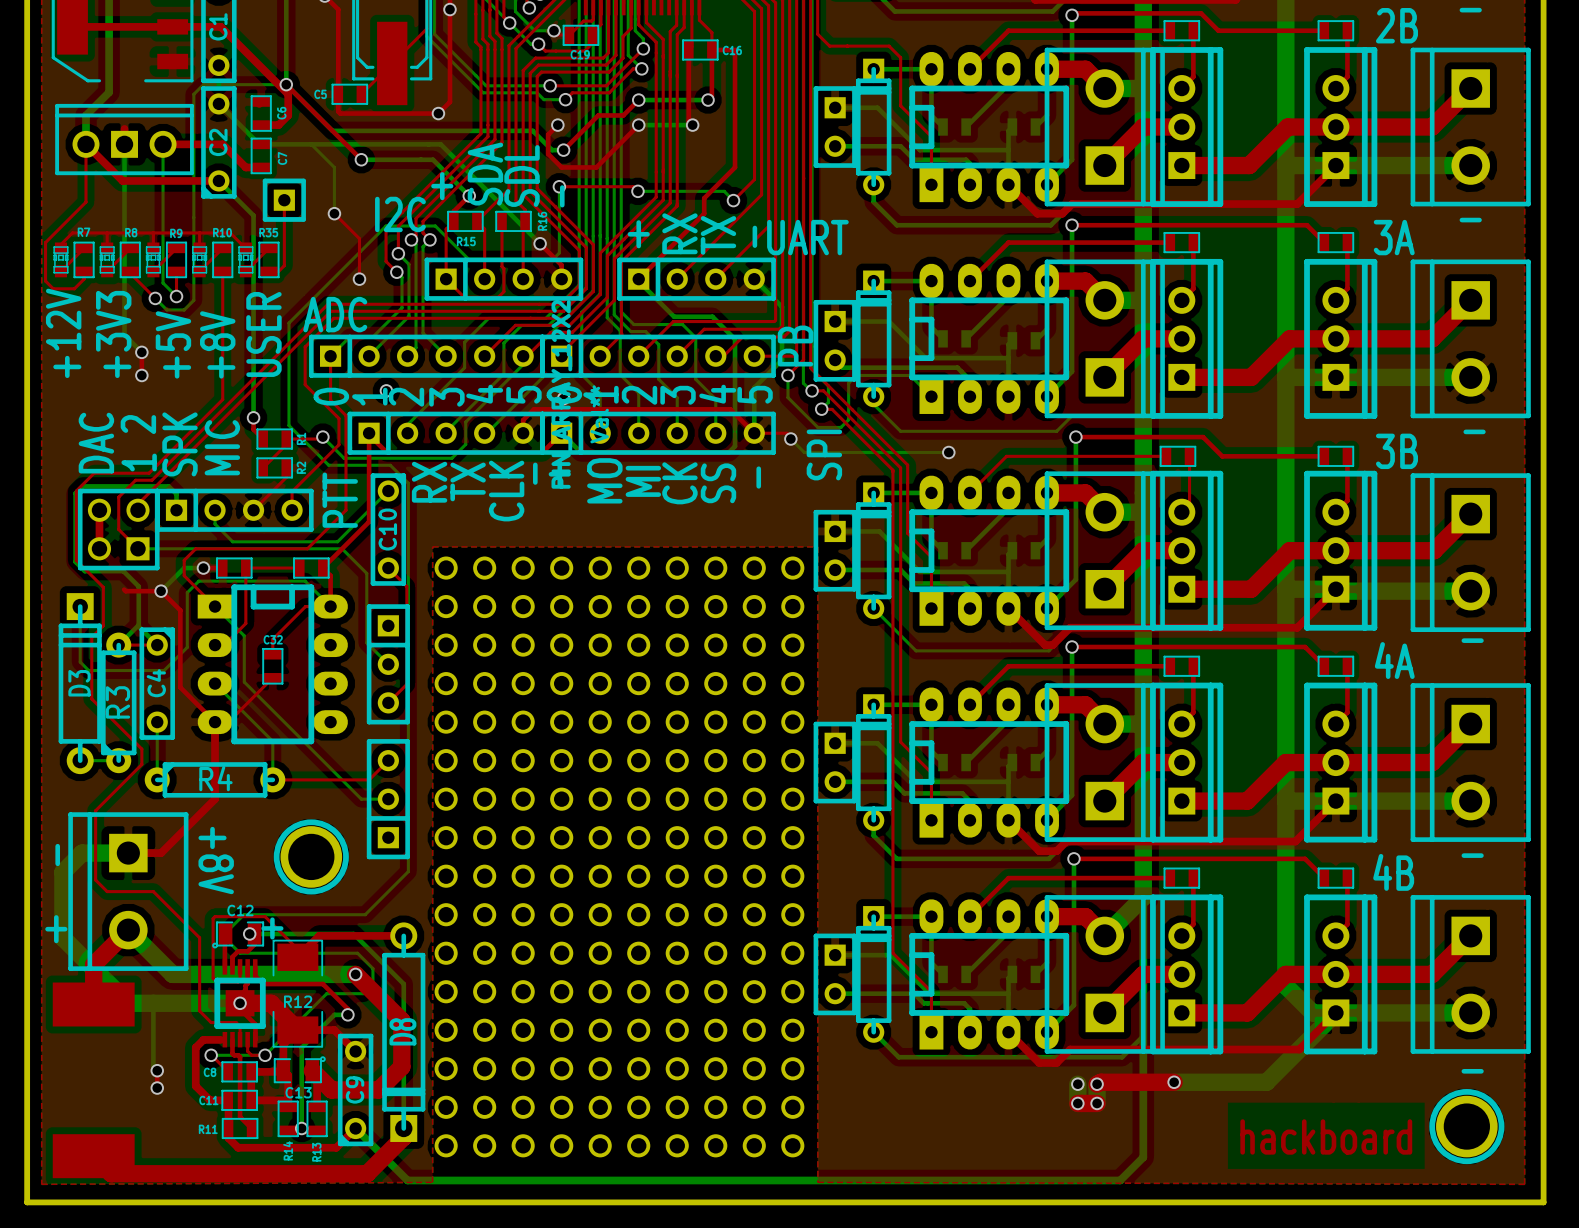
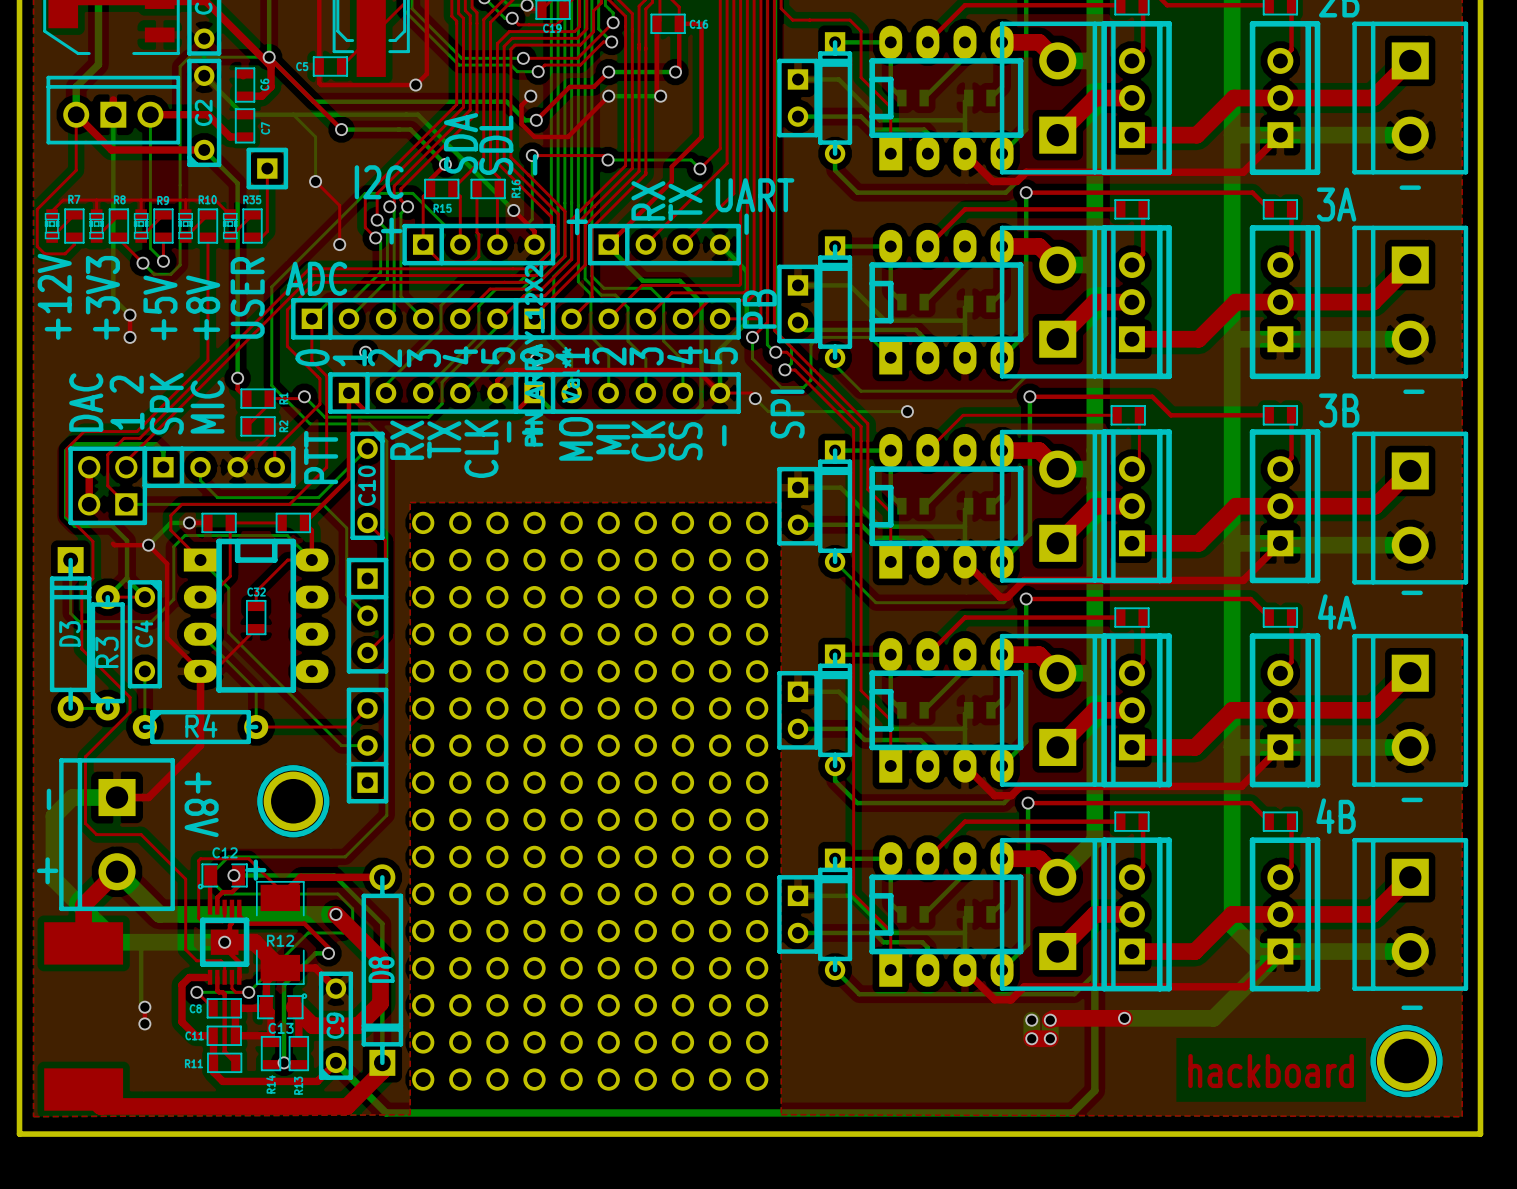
text position: + (442, 186) -> + (391, 231)
text position: + (638, 234) -> + (577, 221)
text position: - (754, 236) -> - (746, 224)
text position: UART (807, 237) -> UART (755, 195)

